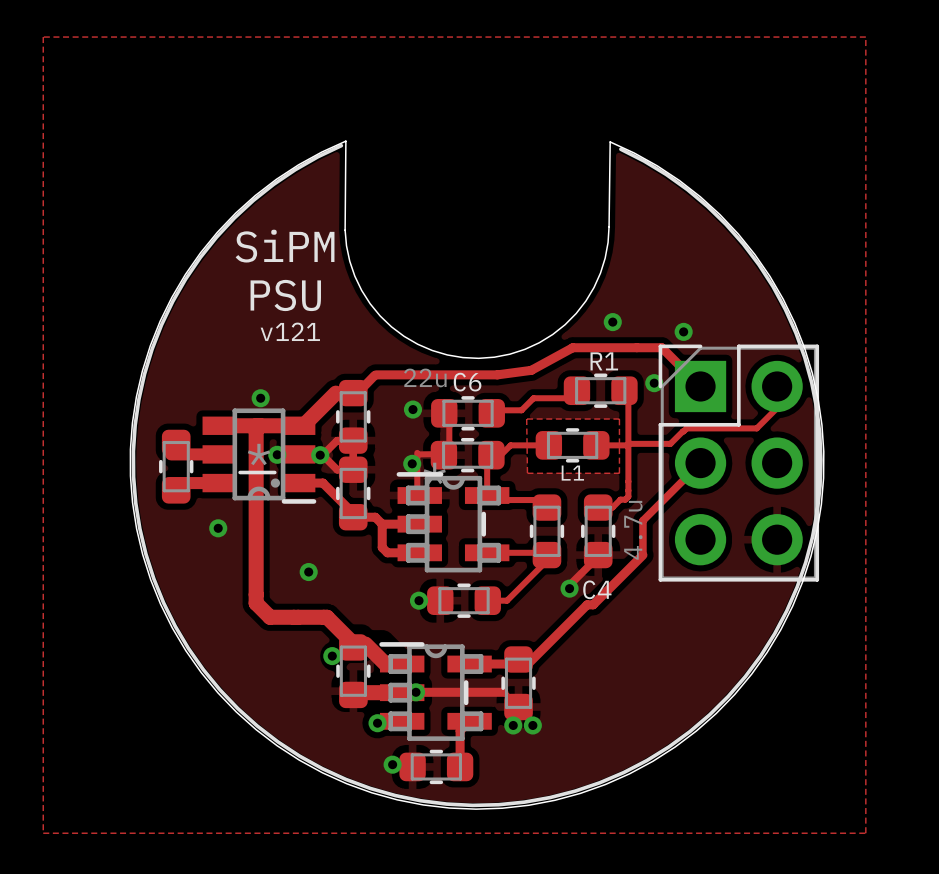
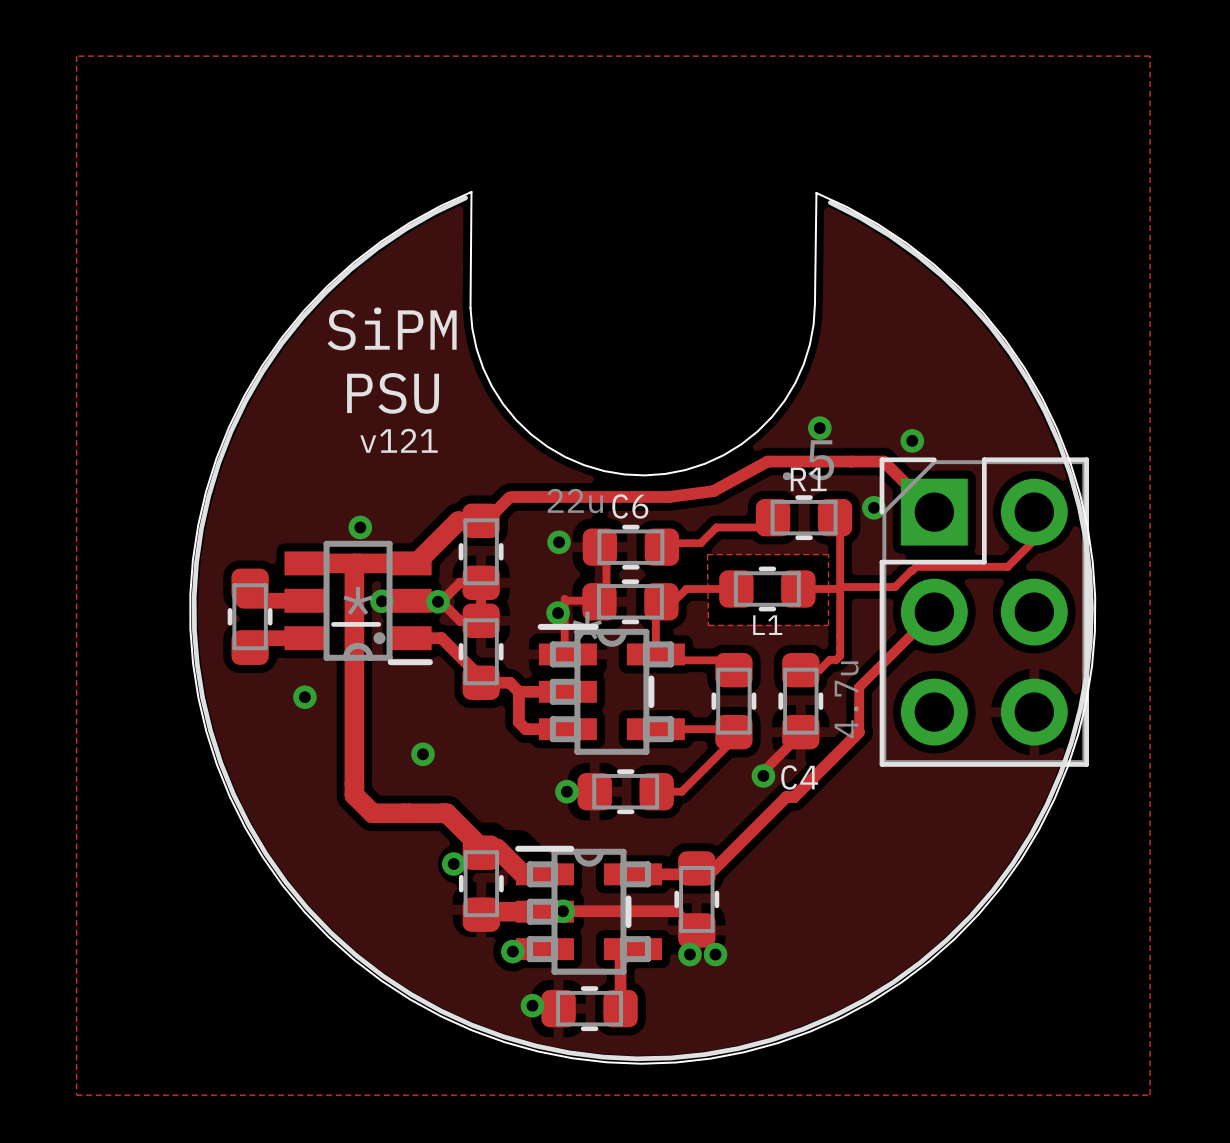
R1 value: none -> .5 (808, 460)

